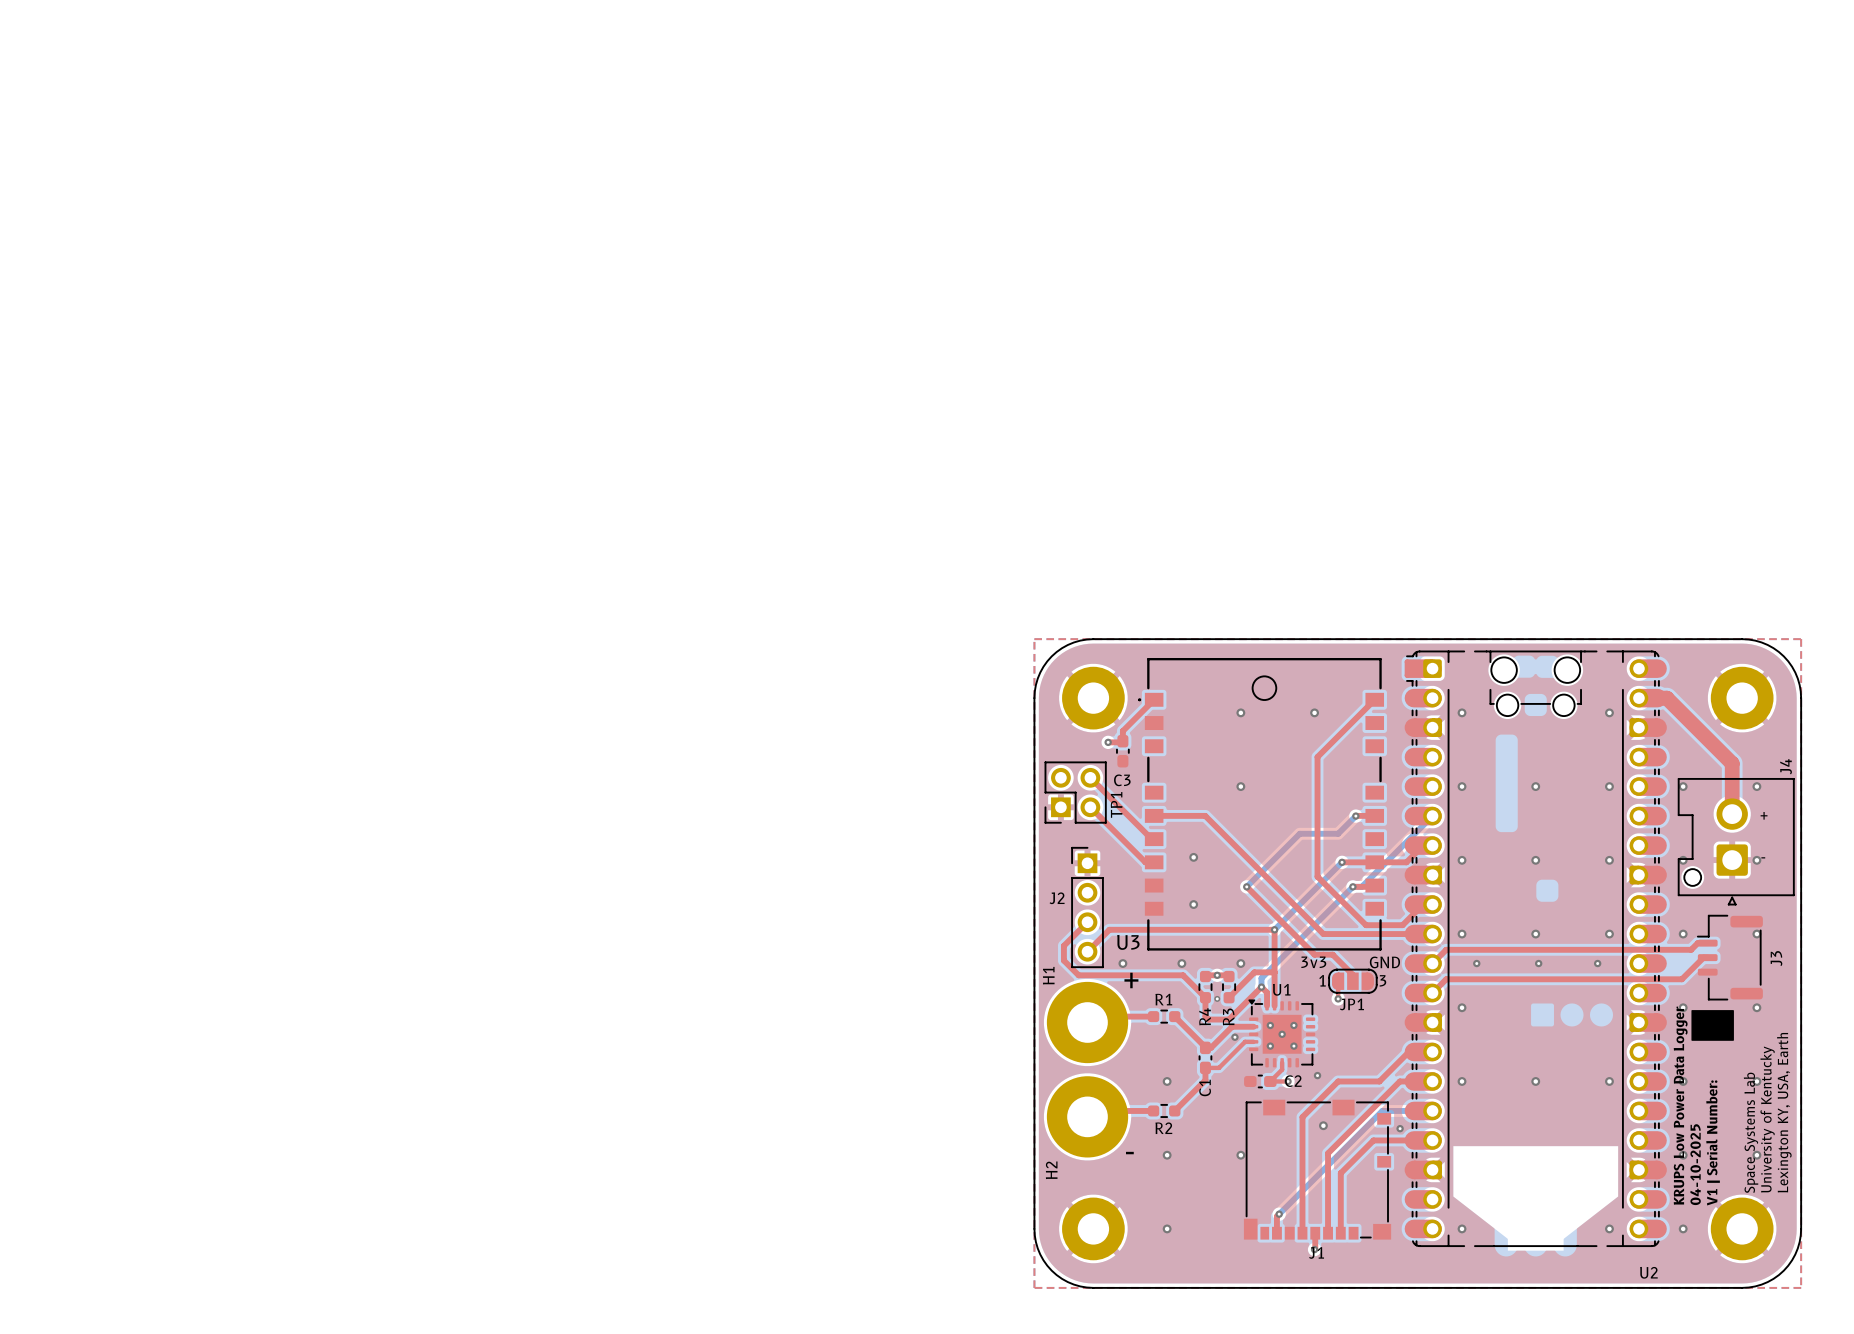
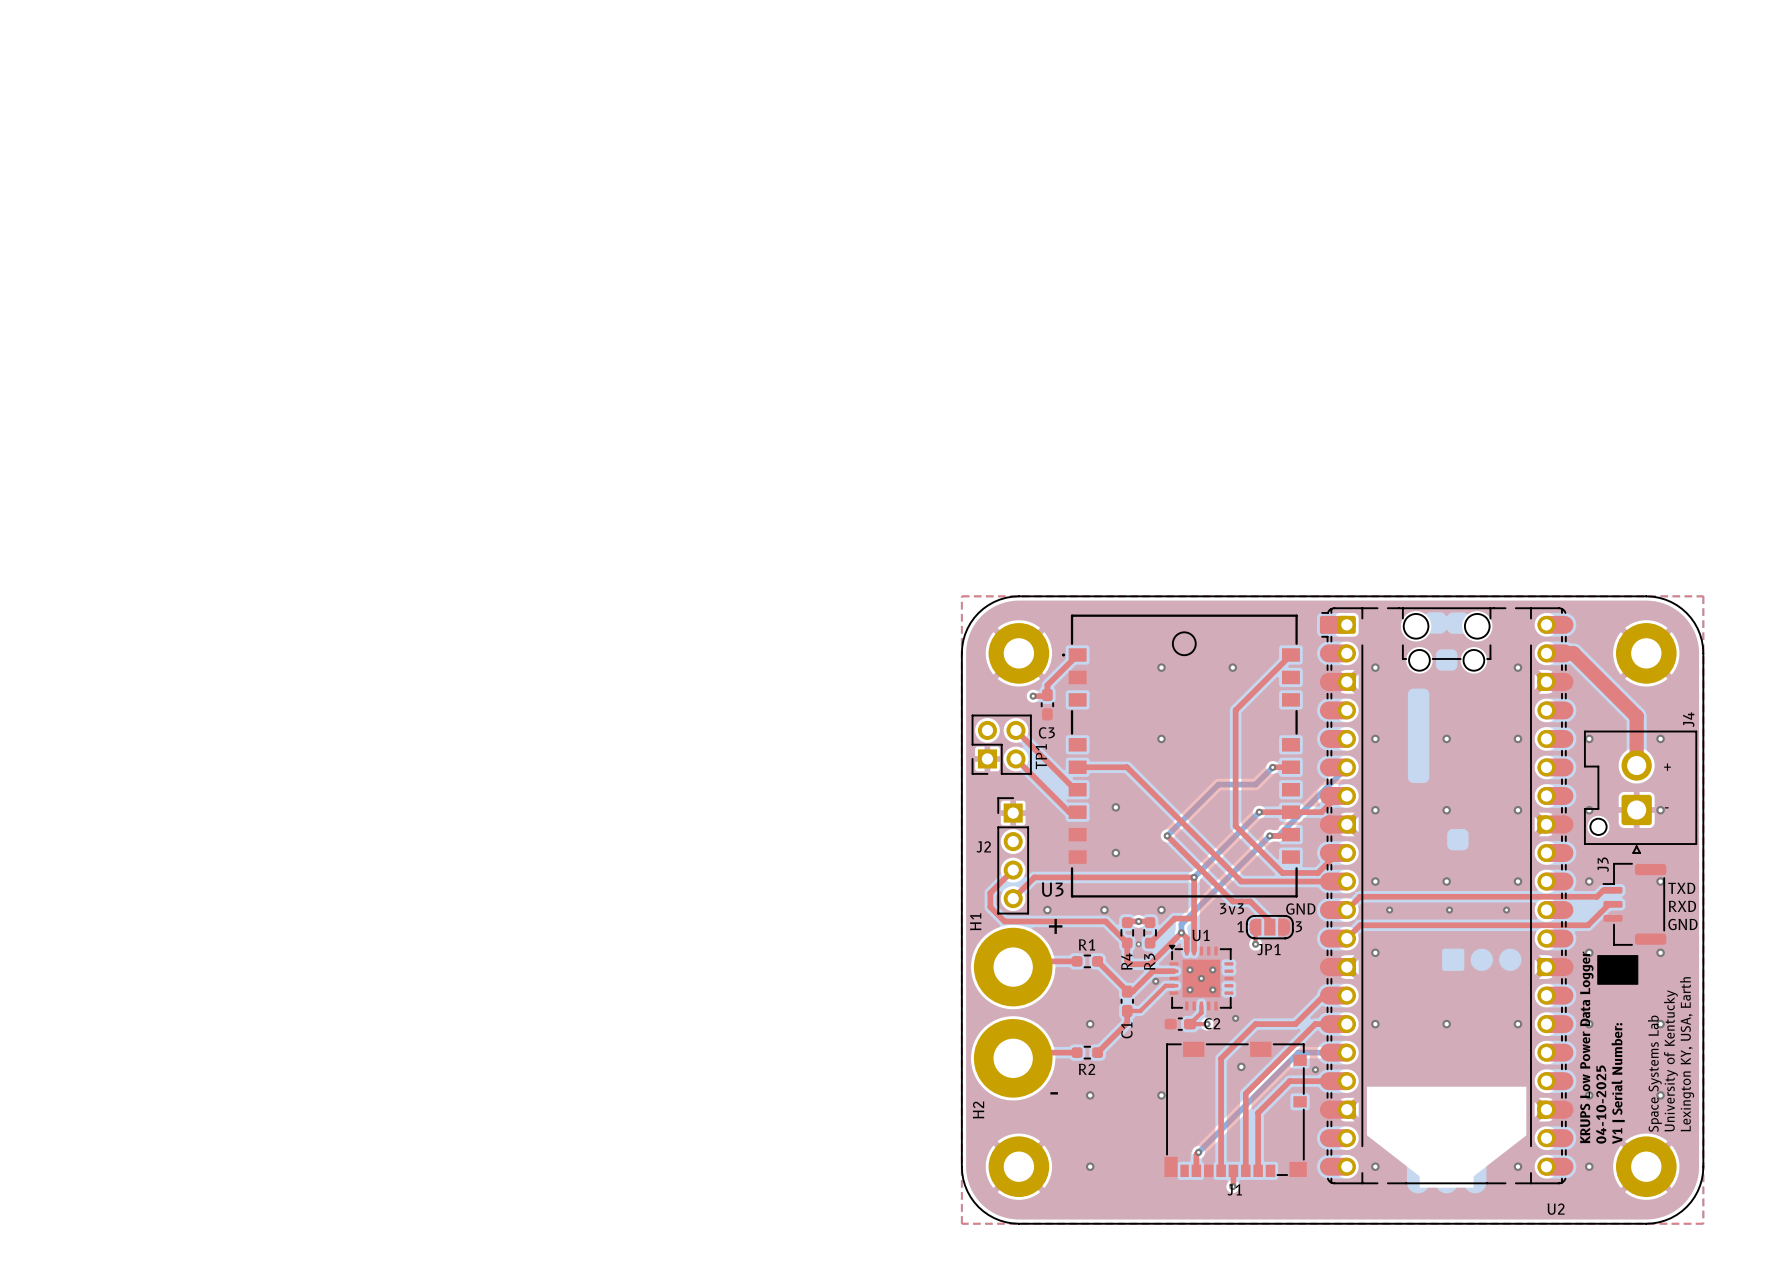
text: none -> TXD (1681, 888)
J3 name position: J3 (1776, 958) -> J3 (1603, 864)
text: none -> RXD (1682, 906)
text: none -> GND (1682, 924)

